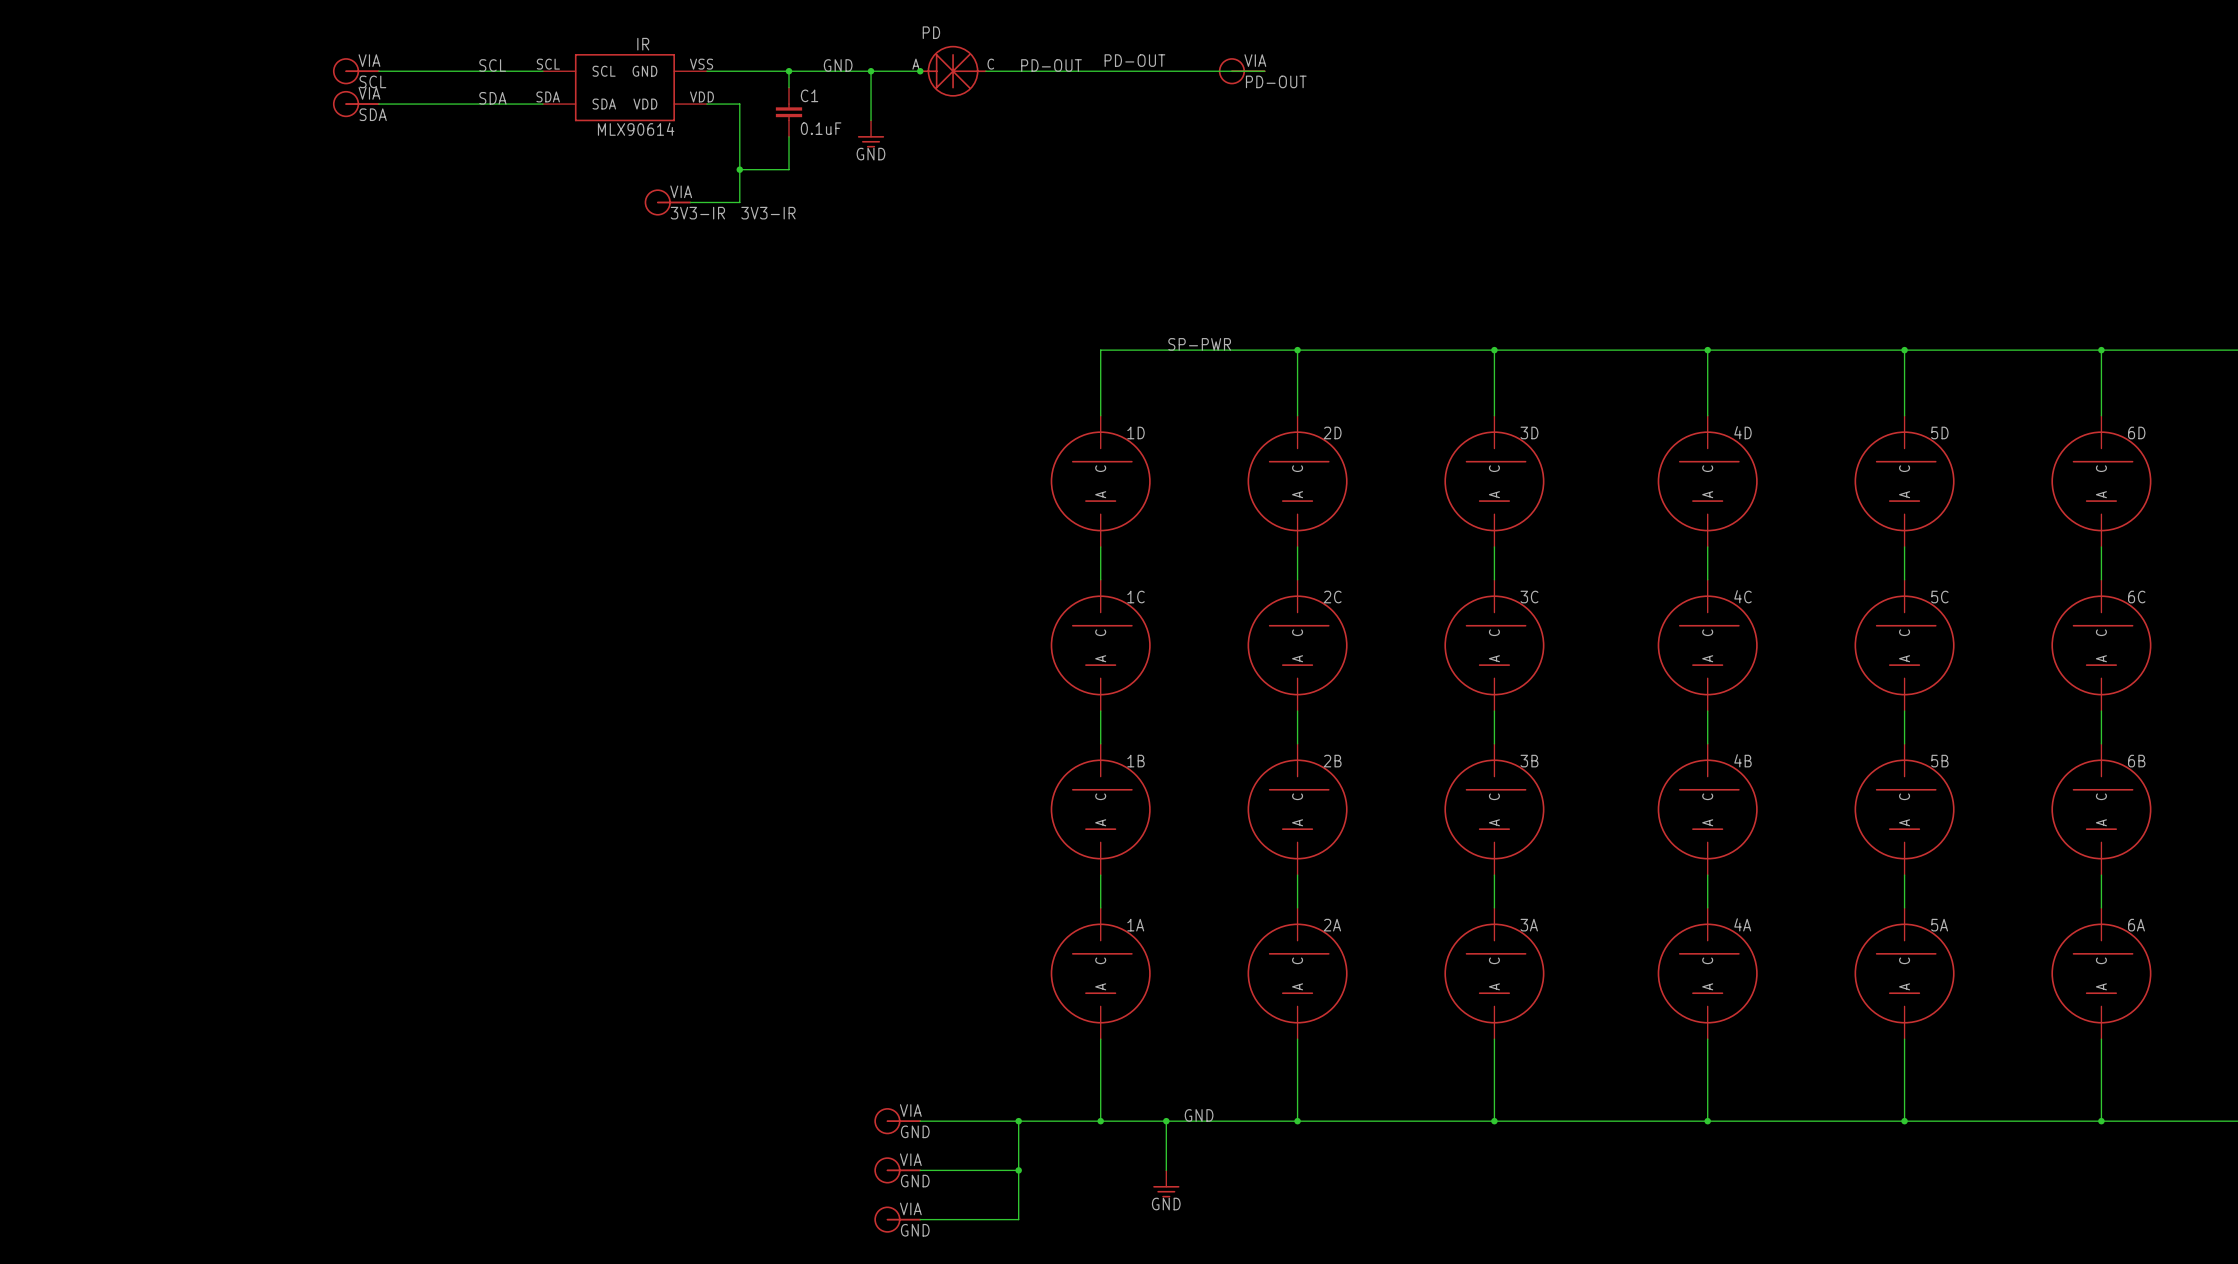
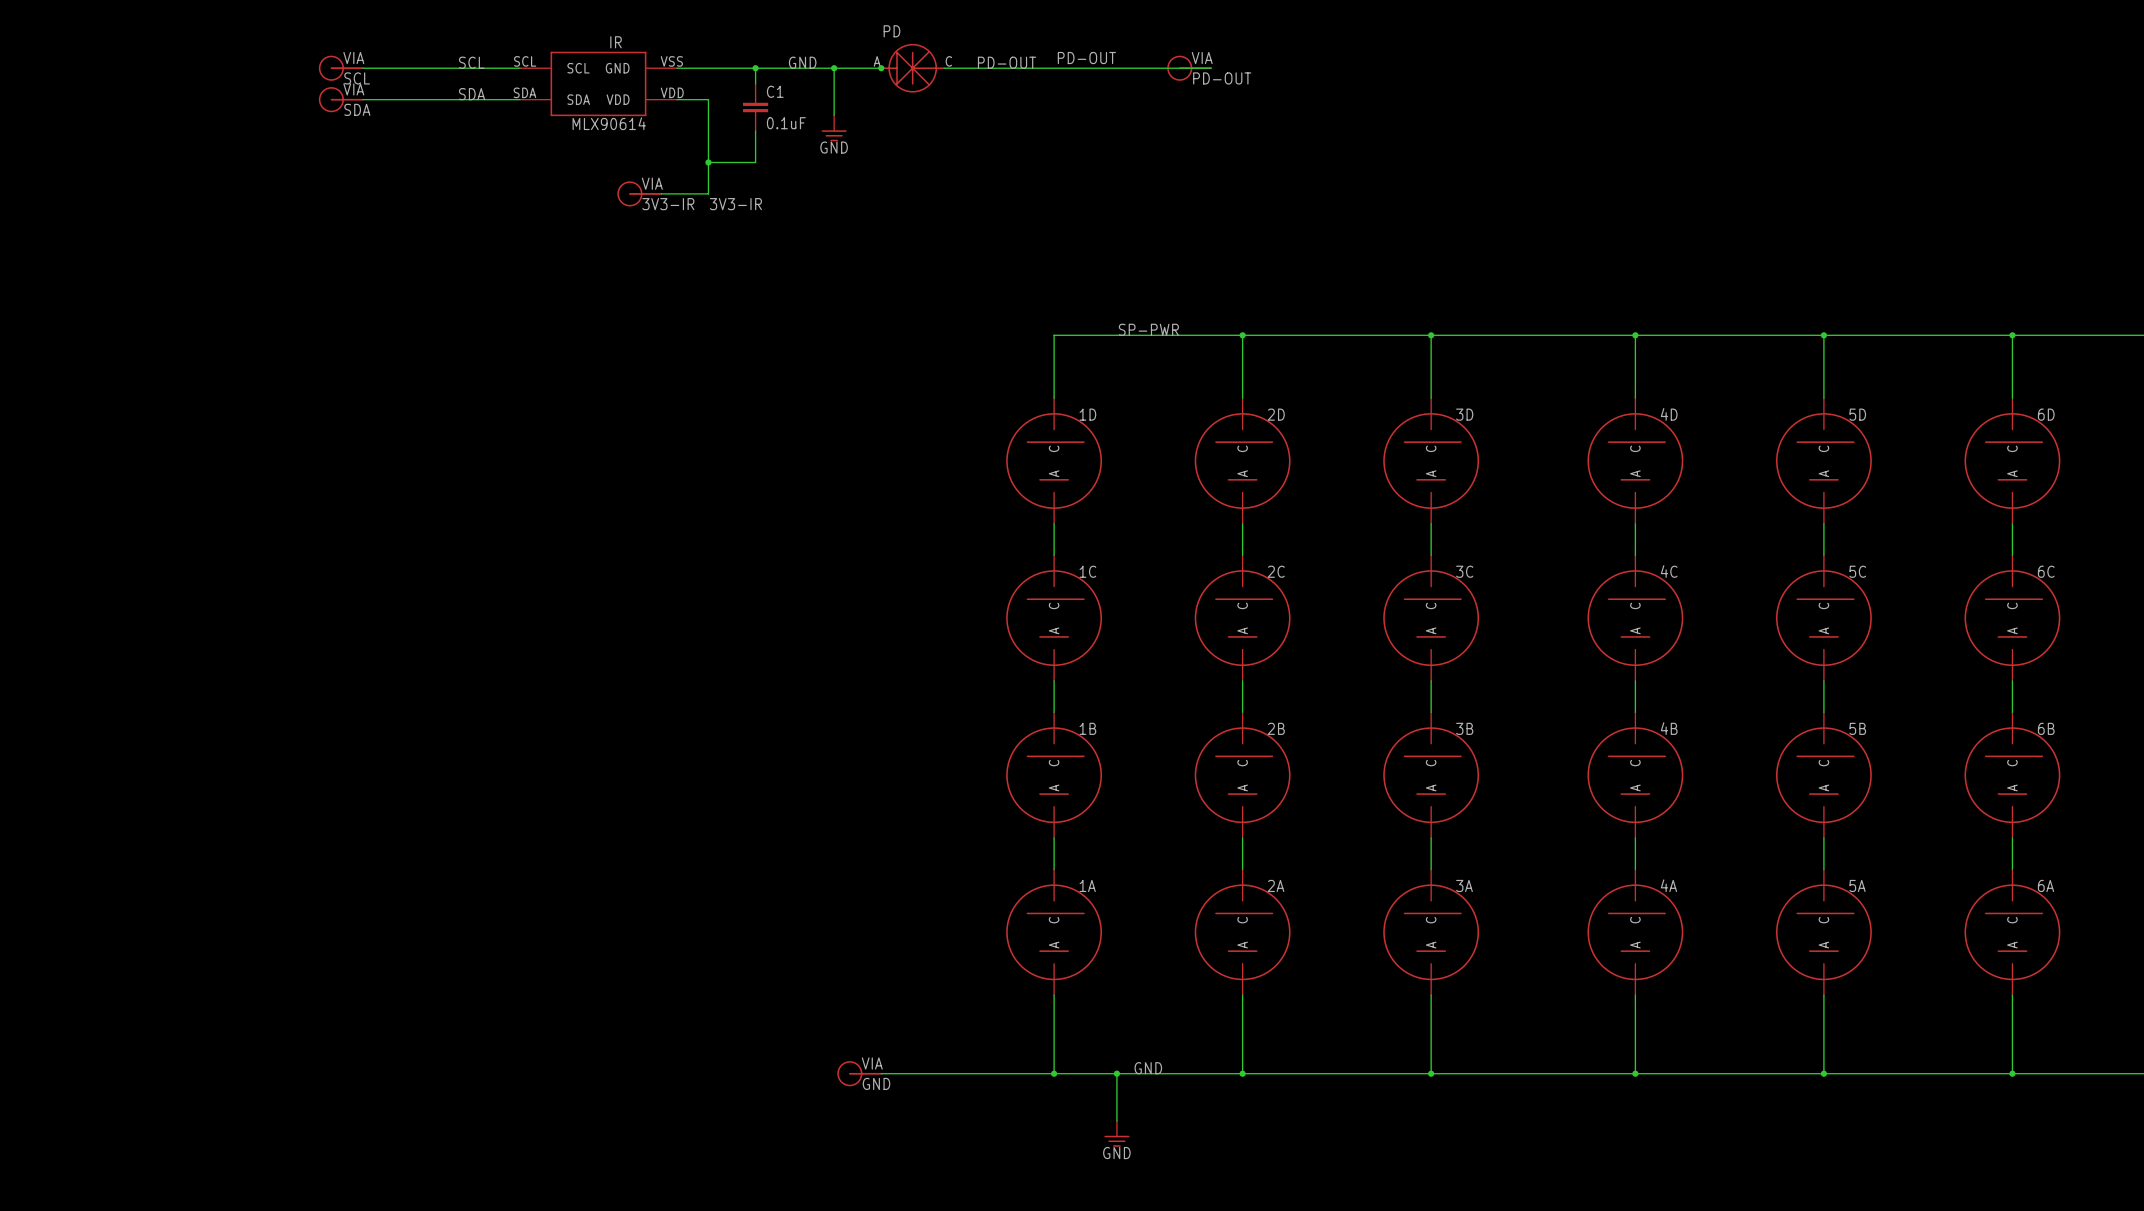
wire: (1018, 1121) (1018, 1219) (920, 1219) -> none
junction: (1018, 1121) -> none
part: GND (897, 1170) -> none
wire: (920, 1170) (1018, 1170) -> none
junction: (1018, 1170) -> none
part: GND (897, 1219) -> none

